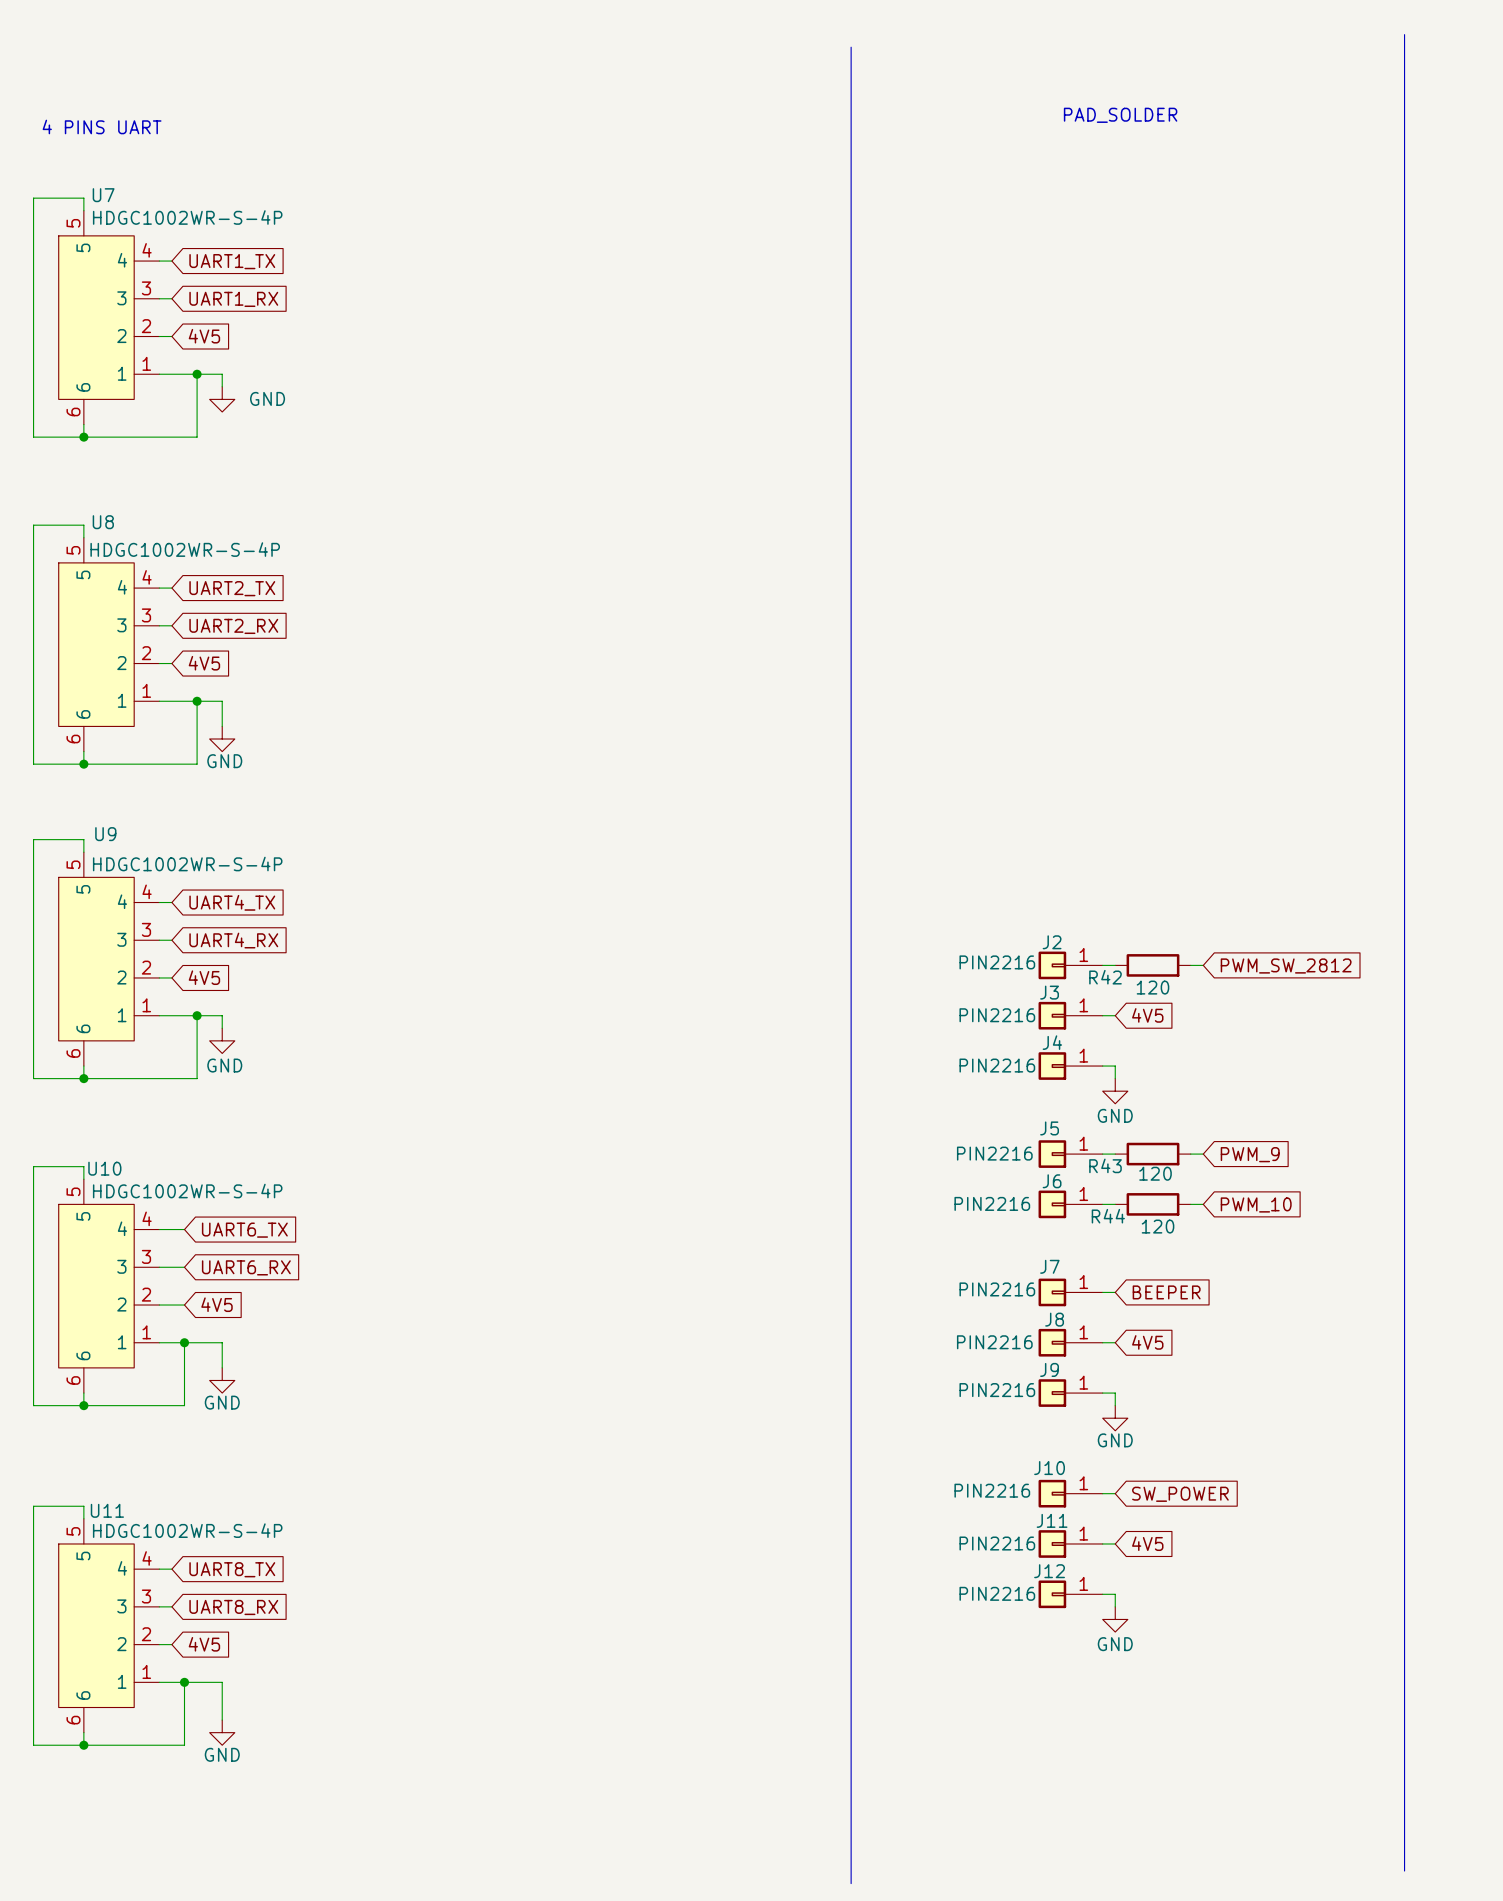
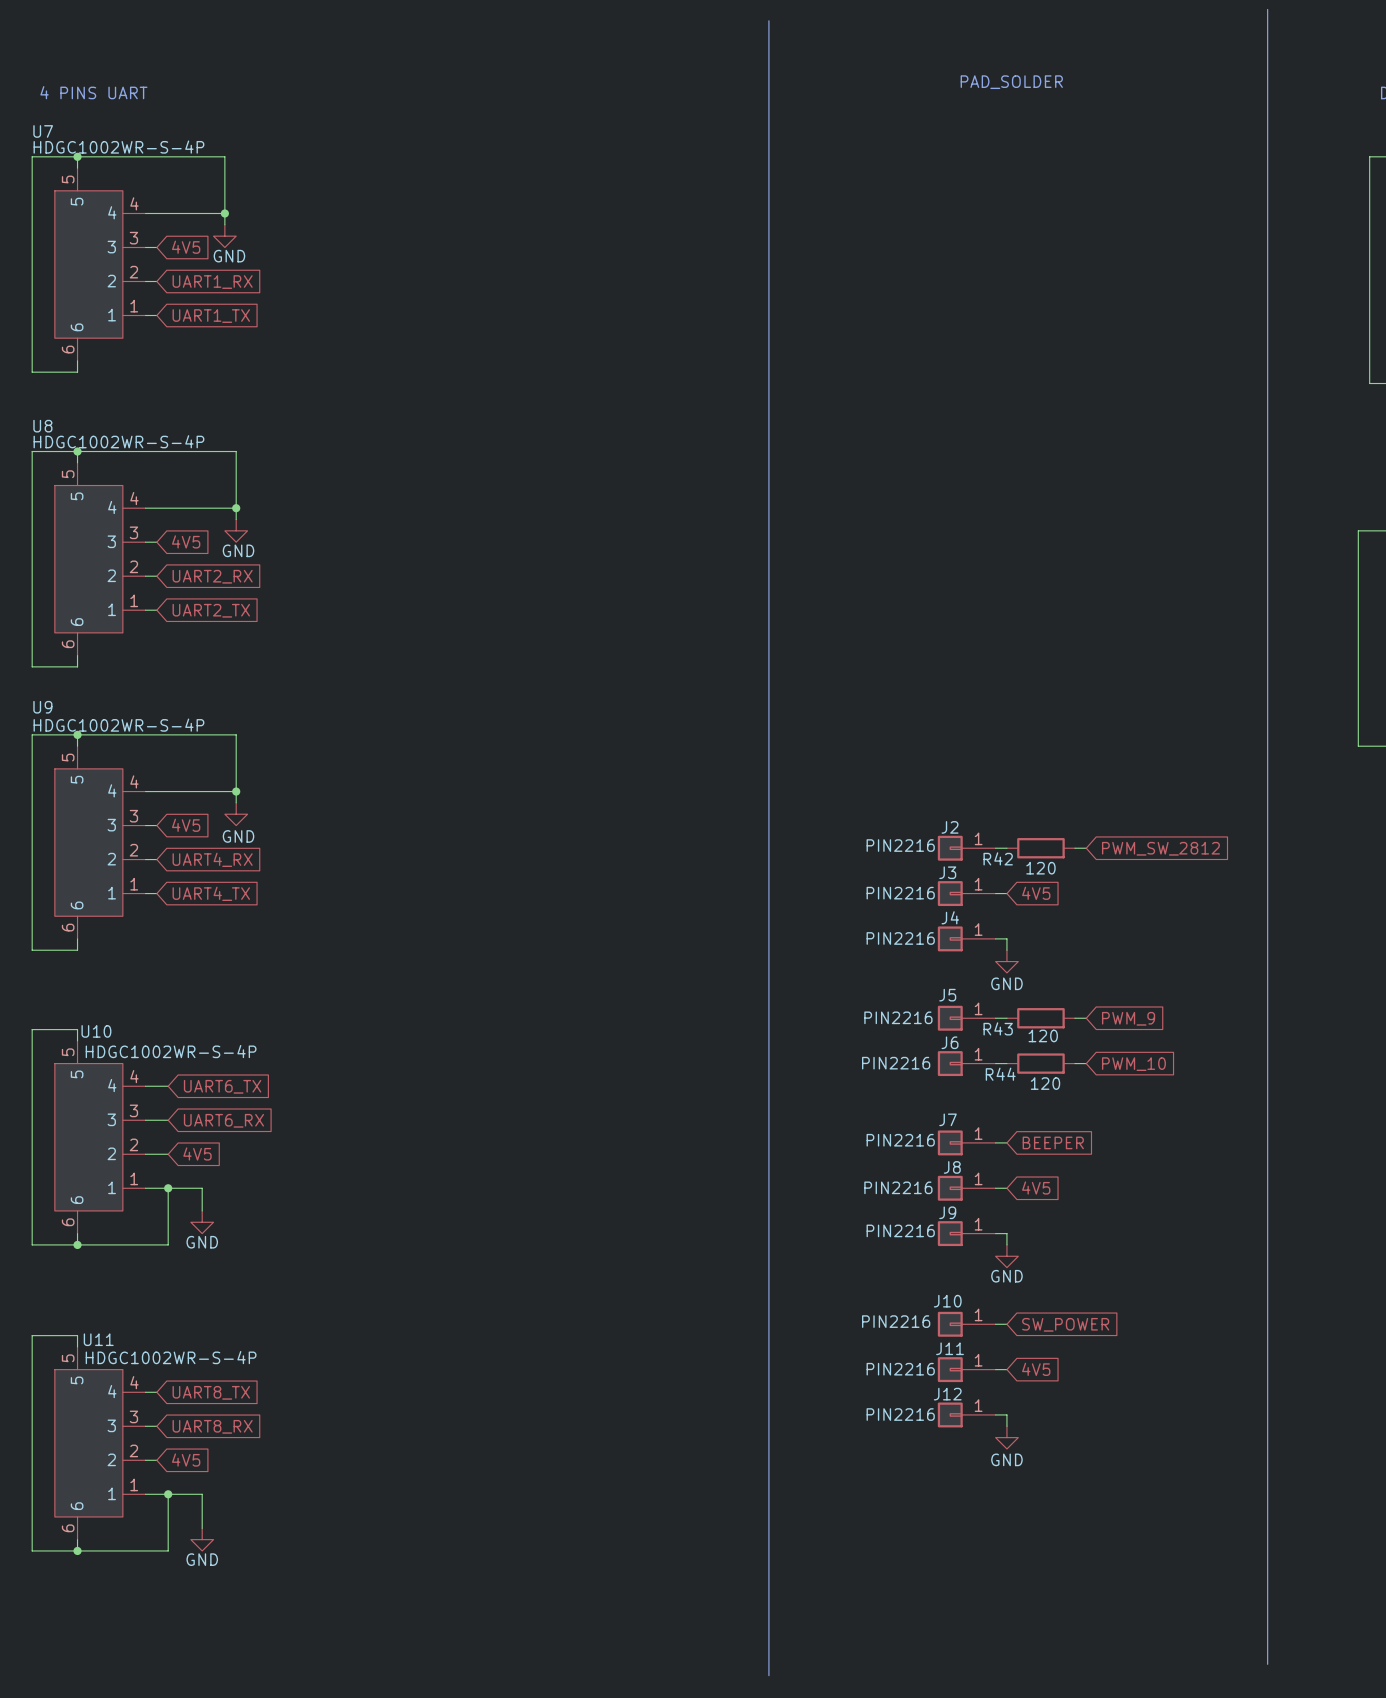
U7 name position: U7 (103, 195) -> U7 (43, 131)
wire: none -> (77, 156) (224, 156) (224, 224)
junction: none -> (77, 156)
U7 value position: HDGC1002WR-S-4P (187, 217) -> HDGC1002WR-S-4P (118, 147)
wire: none -> (156, 213) (224, 213)
global label position: UART1_TX (232, 261) -> UART1_TX (211, 316)
junction: none -> (224, 213)
power symbol: none -> GND (224, 236)
global label: UART1_RX (233, 299) -> 4V5 (186, 247)
global label: 4V5 (204, 336) -> UART1_RX (212, 282)
wire: (171, 374) (222, 374) (222, 386) -> none
wire: (197, 374) (197, 437) (83, 437) -> none
junction: (197, 374) -> none
power symbol: GND (222, 399) -> none
junction: (83, 437) -> none
U8 name position: U8 (103, 522) -> U8 (42, 426)
wire: none -> (77, 451) (236, 451) (236, 519)
junction: none -> (77, 451)
U8 value position: HDGC1002WR-S-4P (185, 549) -> HDGC1002WR-S-4P (118, 441)
wire: none -> (156, 508) (236, 508)
global label position: UART2_TX (232, 588) -> UART2_TX (211, 610)
junction: none -> (236, 508)
power symbol: none -> GND (236, 530)
global label: UART2_RX (233, 626) -> 4V5 (186, 541)
global label: 4V5 (204, 663) -> UART2_RX (212, 576)
wire: (171, 701) (222, 701) (222, 726) -> none
wire: (197, 701) (197, 764) (83, 764) -> none
junction: (197, 701) -> none
power symbol: GND (222, 739) -> none
junction: (83, 764) -> none
U9 name position: U9 (105, 834) -> U9 (42, 707)
wire: none -> (77, 734) (236, 734) (236, 802)
junction: none -> (77, 734)
U9 value position: HDGC1002WR-S-4P (187, 864) -> HDGC1002WR-S-4P (118, 725)
wire: none -> (156, 791) (236, 791)
global label position: UART4_TX (232, 902) -> UART4_TX (211, 893)
junction: none -> (236, 791)
power symbol: none -> GND (236, 814)
global label: UART4_RX (233, 940) -> 4V5 (186, 825)
global label: 4V5 (204, 977) -> UART4_RX (212, 859)
wire: (171, 1015) (222, 1015) (222, 1028) -> none
wire: (197, 1015) (197, 1078) (83, 1078) -> none
junction: (197, 1015) -> none
power symbol: GND (222, 1040) -> none
junction: (83, 1078) -> none

